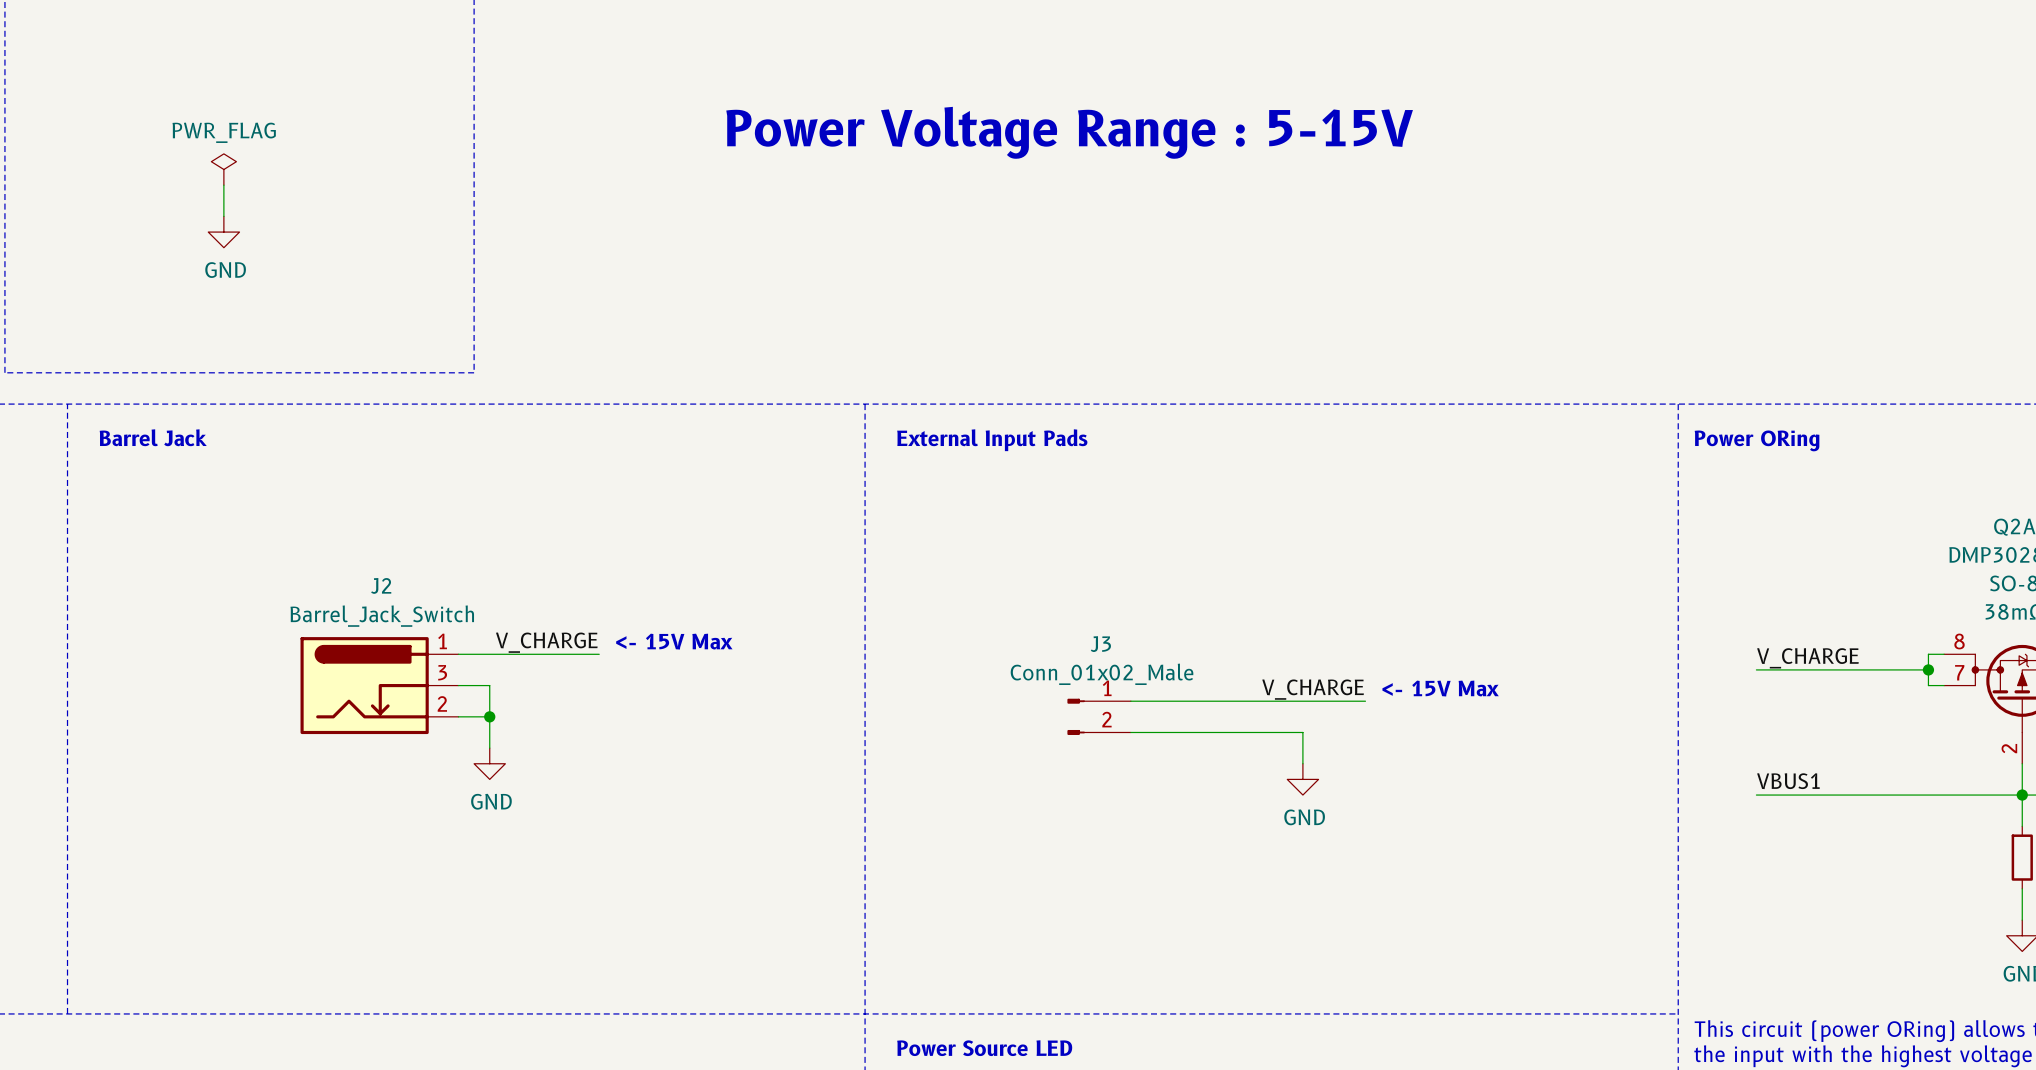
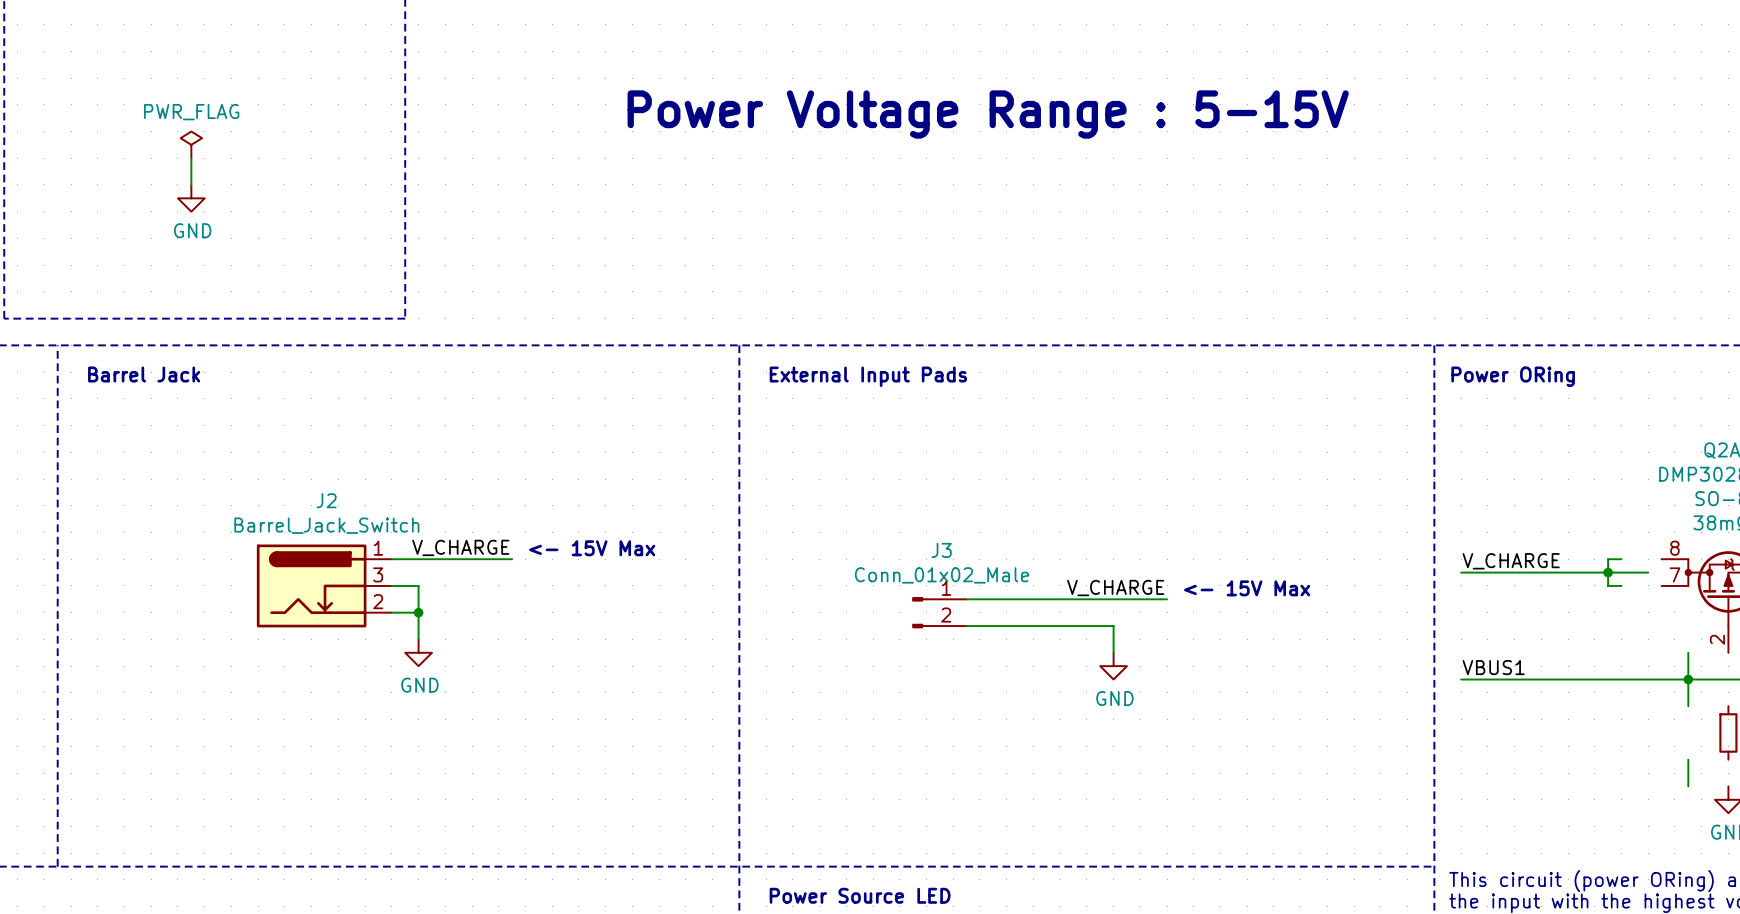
wire: (1944, 654) (1928, 654) (1928, 685) (1944, 685) -> (1621, 559) (1608, 559) (1608, 585) (1621, 585)
label position: V_CHARGE (1807, 658) -> V_CHARGE (1511, 561)
wire: none -> (1461, 572) (1501, 572)
junction position: (1928, 669) -> (1608, 572)
wire: (2022, 763) (2022, 826) -> (1688, 652) (1688, 706)
label position: VBUS1 (1788, 781) -> VBUS1 (1493, 667)
wire: none -> (1461, 679) (1501, 679)
junction: none -> (1688, 679)
junction: (2022, 795) -> none
wire: (2022, 888) (2022, 920) -> (1688, 759) (1688, 786)

